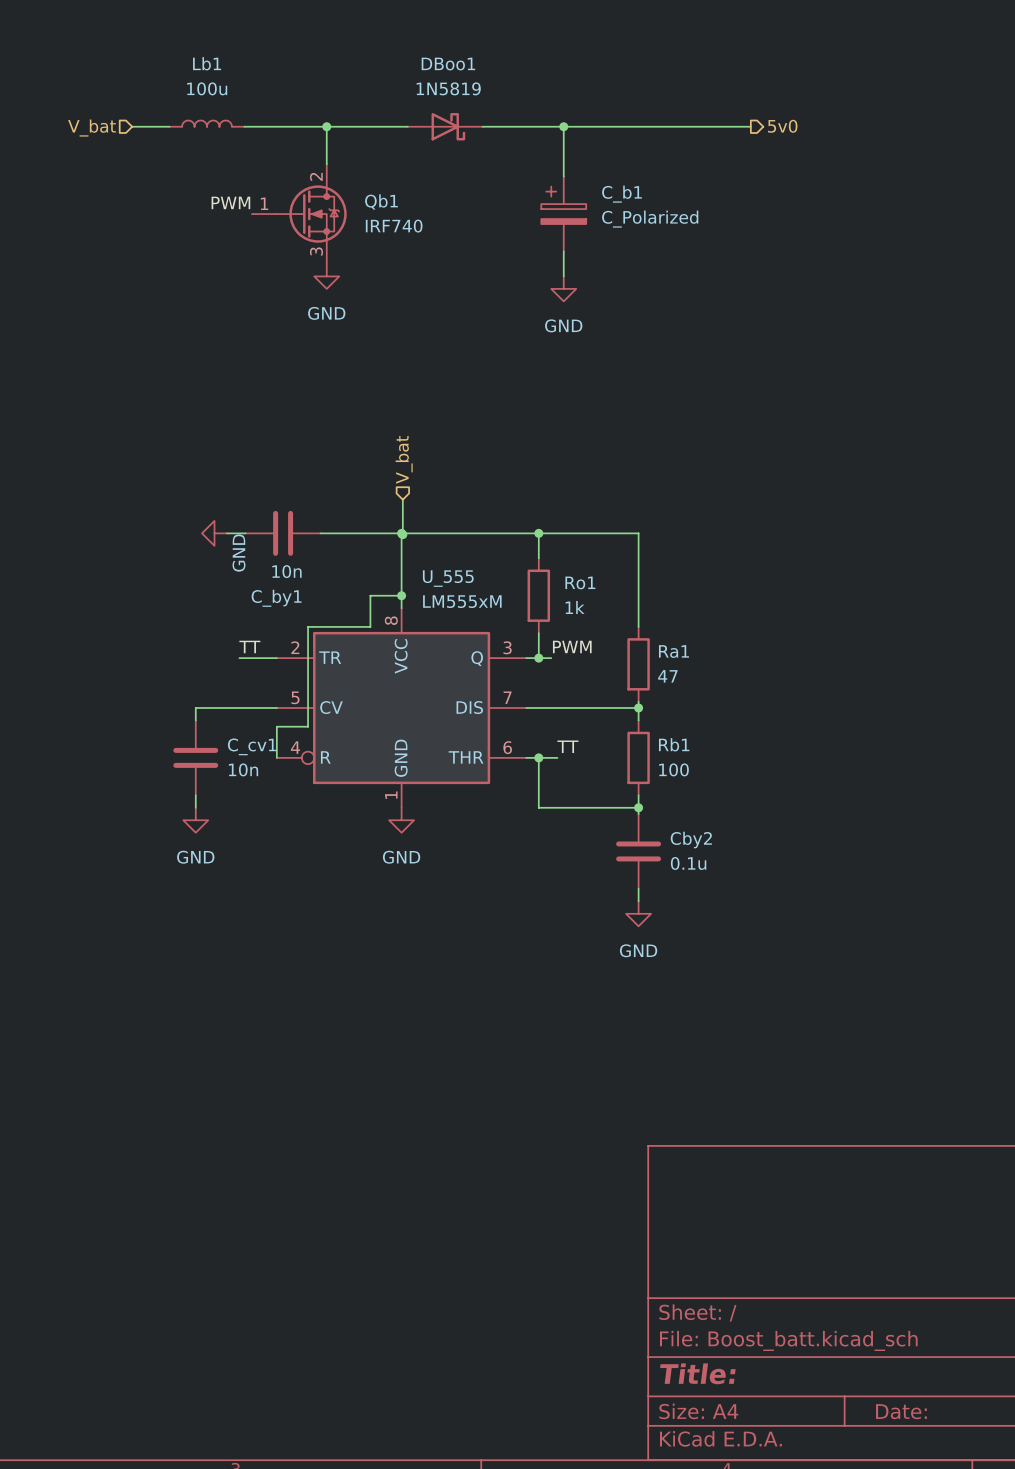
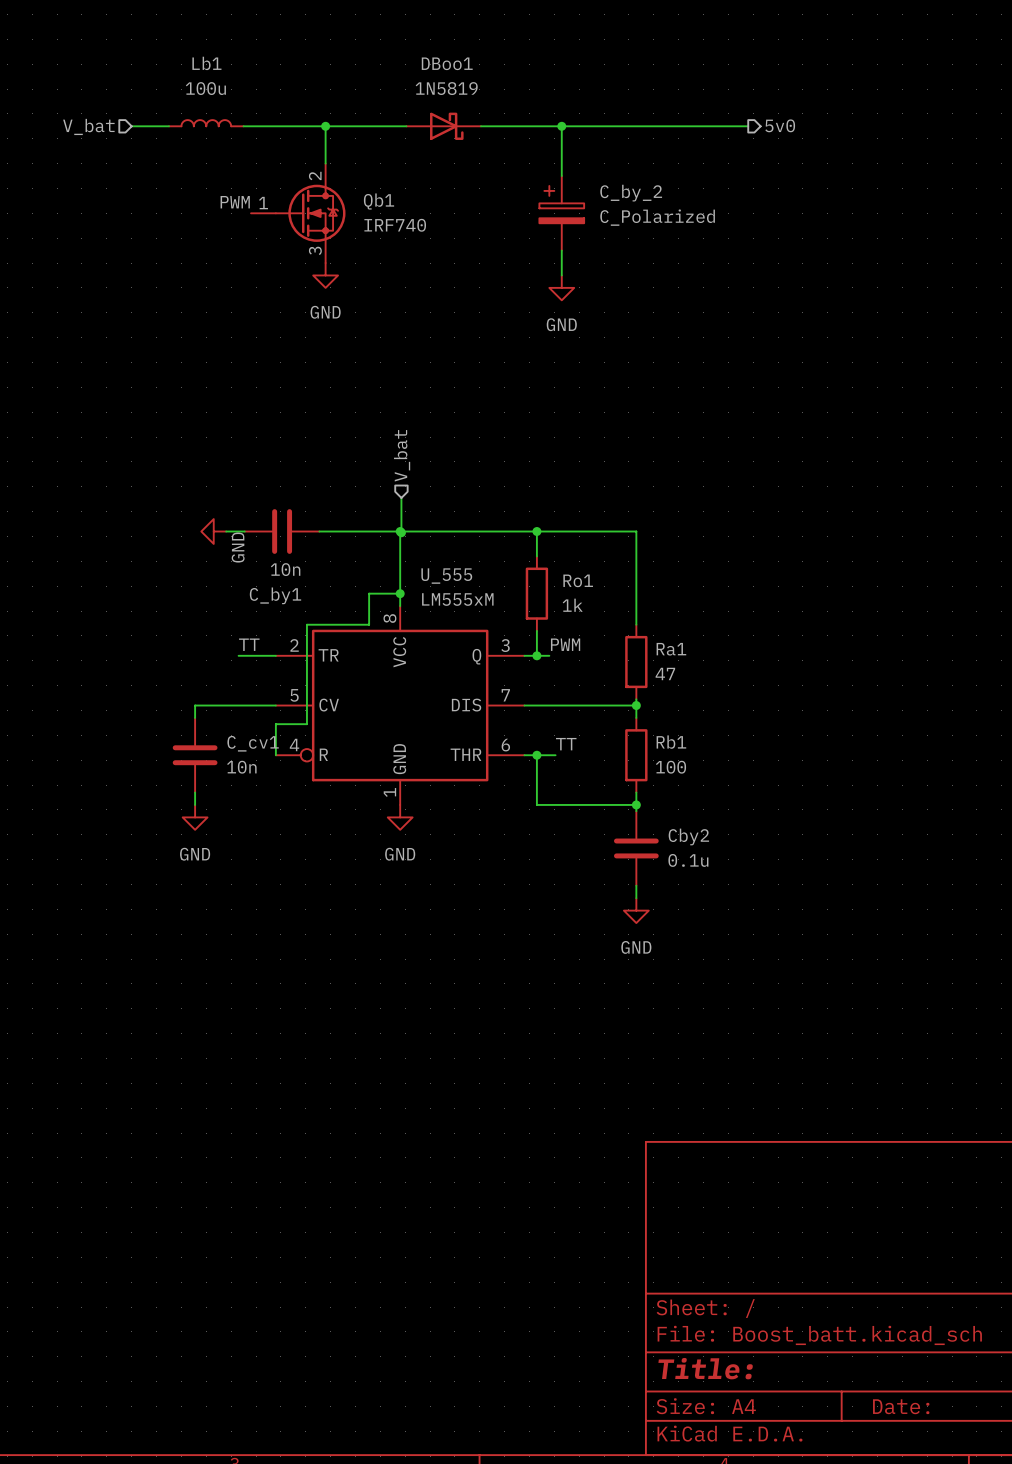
C_b1 name: C_b1 (621, 194) -> C_by_2 (631, 193)

